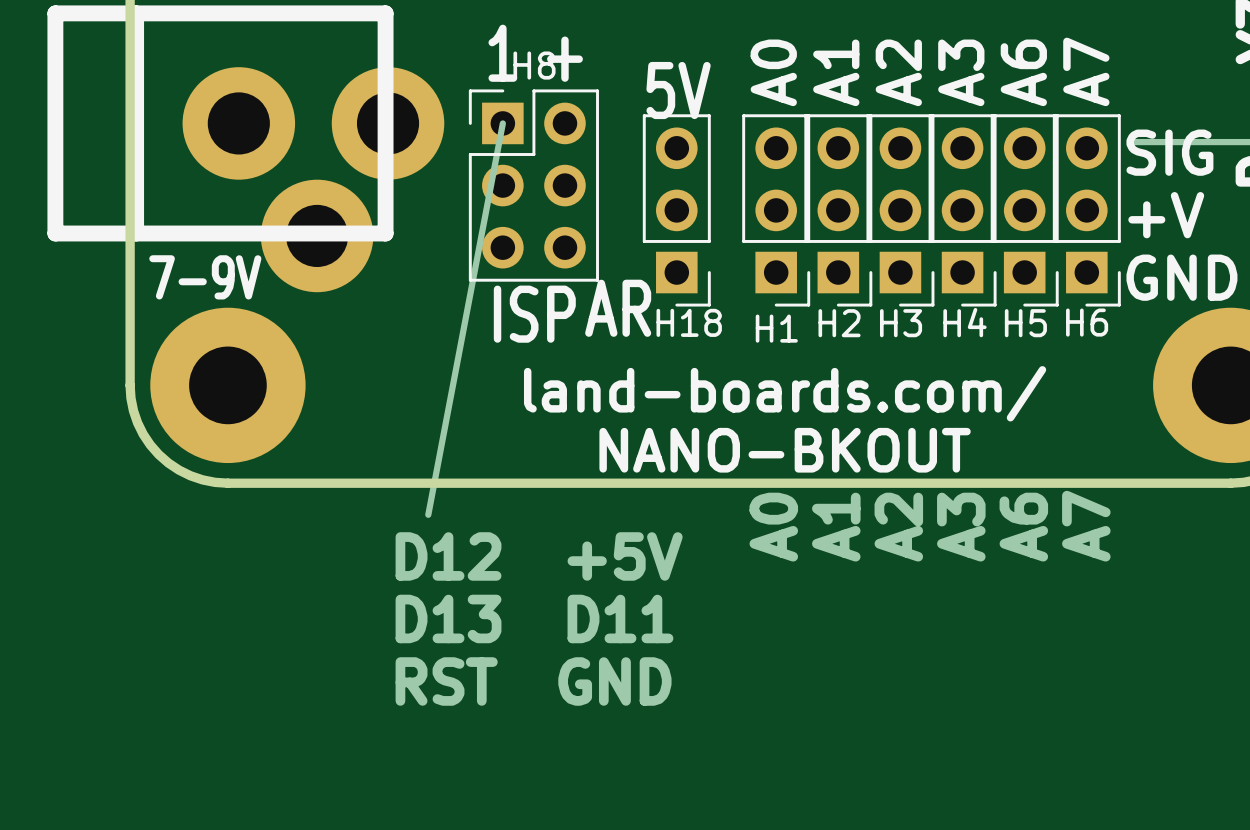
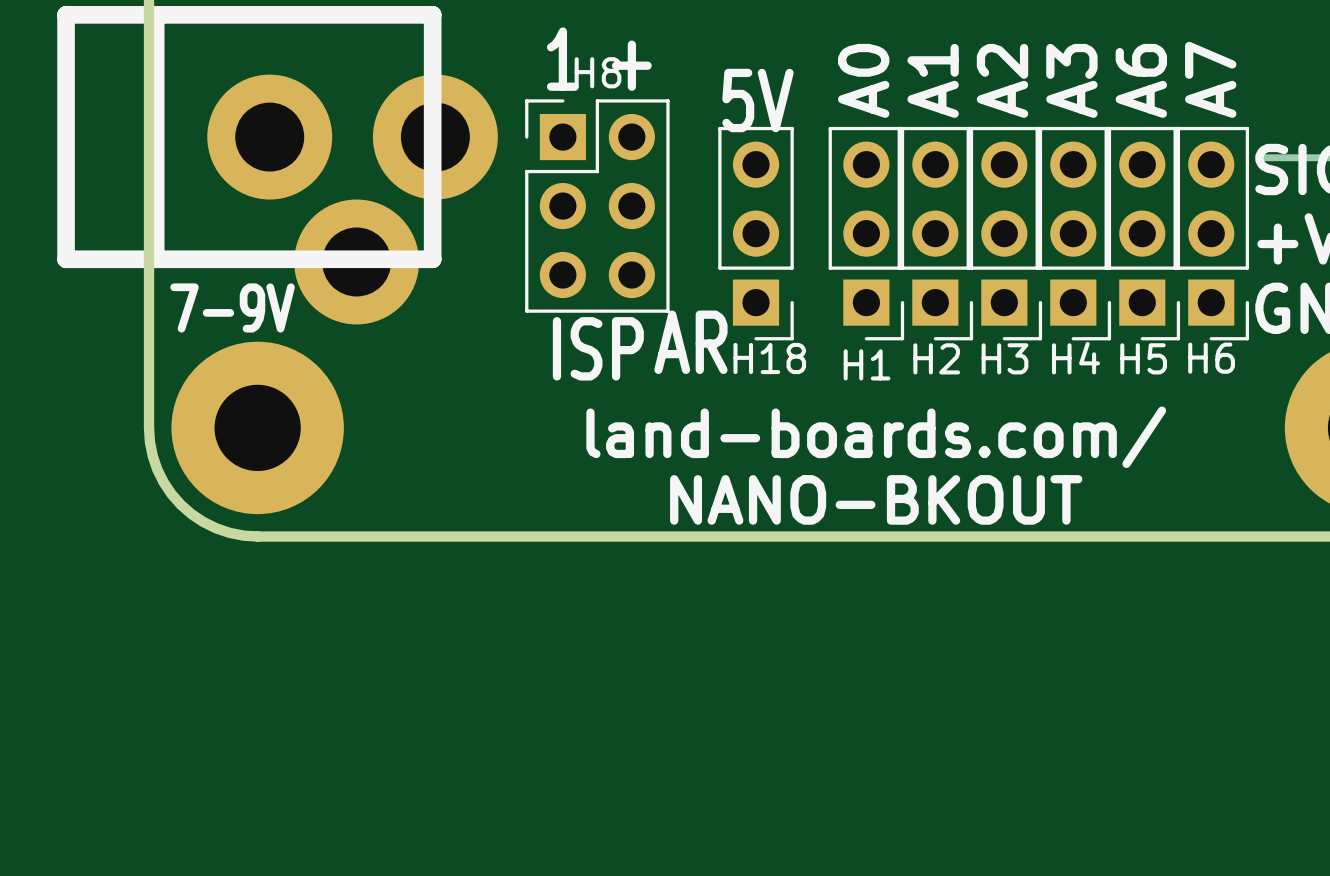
line: (502, 123) (428, 514) -> none
text: A7 (1086, 526) -> none
text: A0 (773, 527) -> none
text: A1 (836, 527) -> none
text: A2 (898, 527) -> none
text: A3 (961, 527) -> none
text: A6 (1023, 527) -> none
text: D12 +5V (539, 556) -> none
text: D13 D11 (534, 618) -> none
text: RST GND (533, 681) -> none

